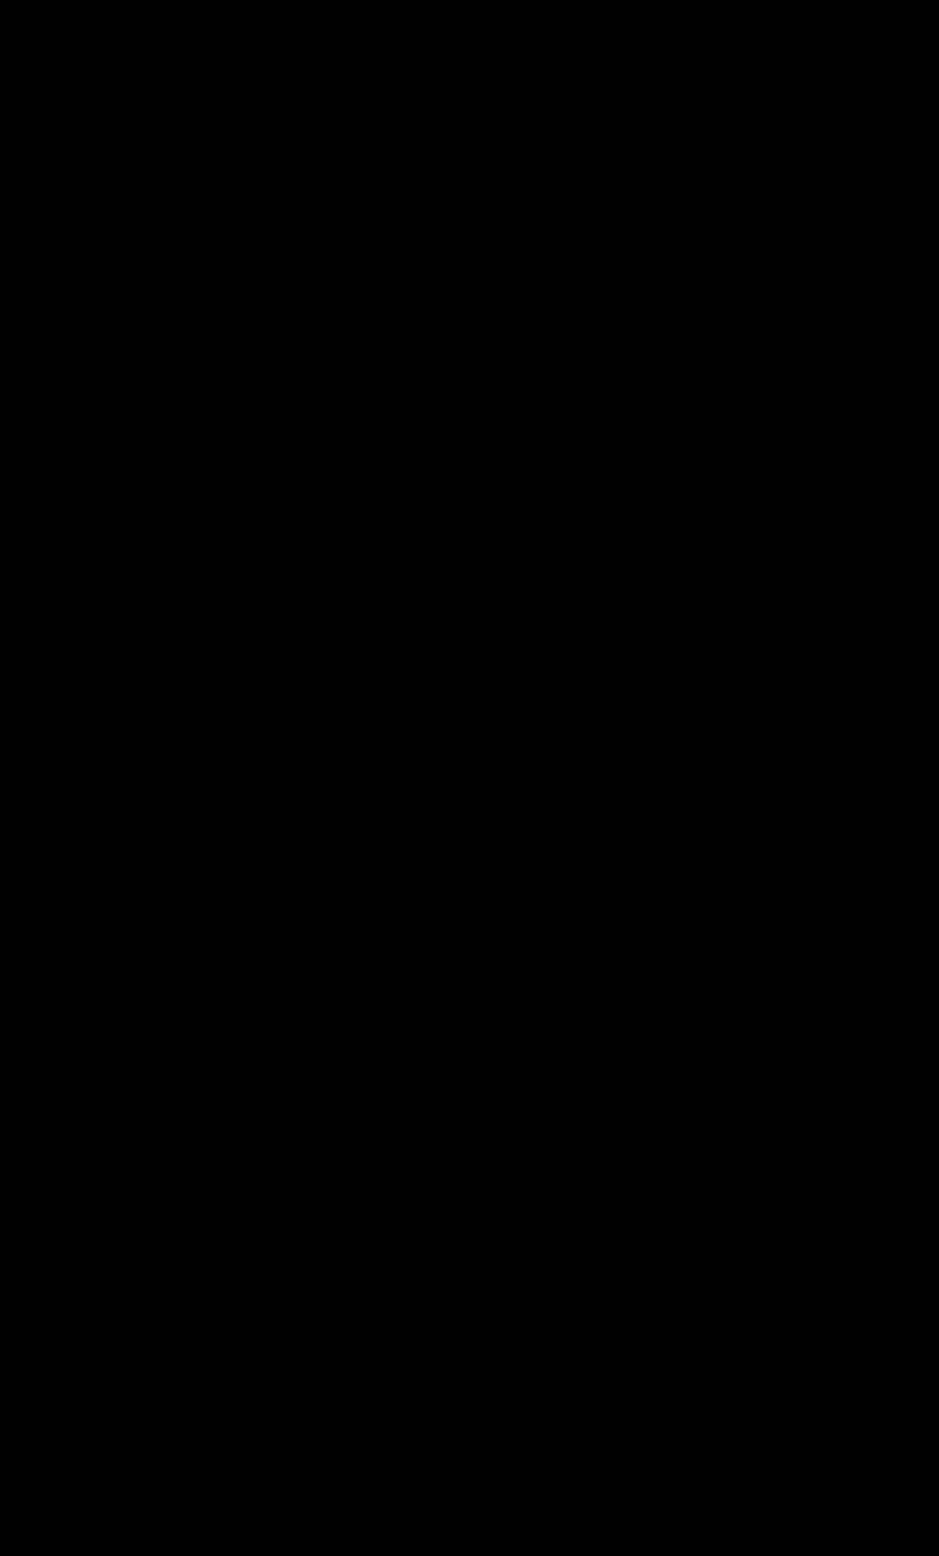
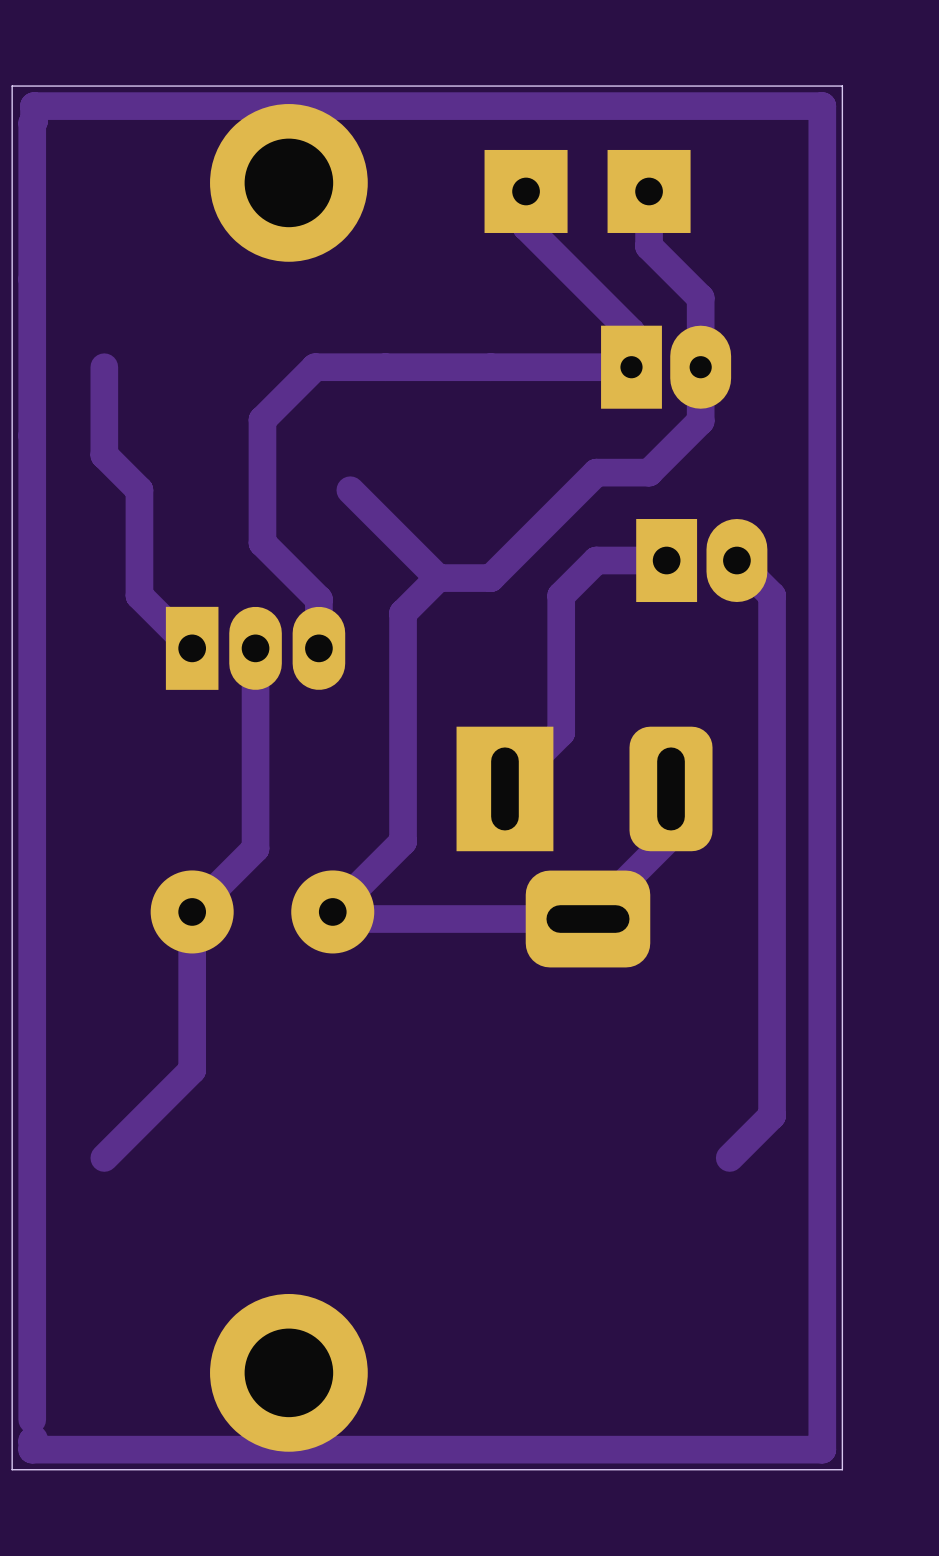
board edge: none -> (842, 86) (12, 86) (12, 1469) (842, 1469) (842, 86)
part: none -> (288, 182)
track: none -> (526, 191) (526, 226) (631, 332) (631, 367) (315, 367) (262, 419) (262, 542) (318, 599) (318, 648)
part: none -> (526, 191)
track: none -> (649, 191) (649, 246) (700, 298) (700, 421) (649, 472) (596, 472) (490, 578) (438, 578)
part: none -> (649, 191)
track: none -> (104, 367) (104, 455) (139, 490) (139, 595) (192, 648)
part: none -> (666, 367)
track: none -> (350, 490) (438, 578)
track: none -> (666, 560) (596, 560) (561, 595) (561, 732) (504, 788)
part: none -> (701, 560)
track: none -> (736, 560) (772, 595) (772, 1115) (729, 1157)
track: none -> (438, 578) (403, 613) (403, 841) (332, 911) (339, 919) (587, 919) (671, 835) (671, 788)
track: none -> (255, 648) (255, 848) (192, 911) (192, 1070) (104, 1157)
part: none -> (255, 648)
part: none -> (584, 847)
part: none -> (262, 911)
part: none -> (288, 1372)
track: none -> (32, 1419) (32, 122) (34, 121) (34, 106) (822, 106) (822, 1449) (32, 1449) (34, 1439)

